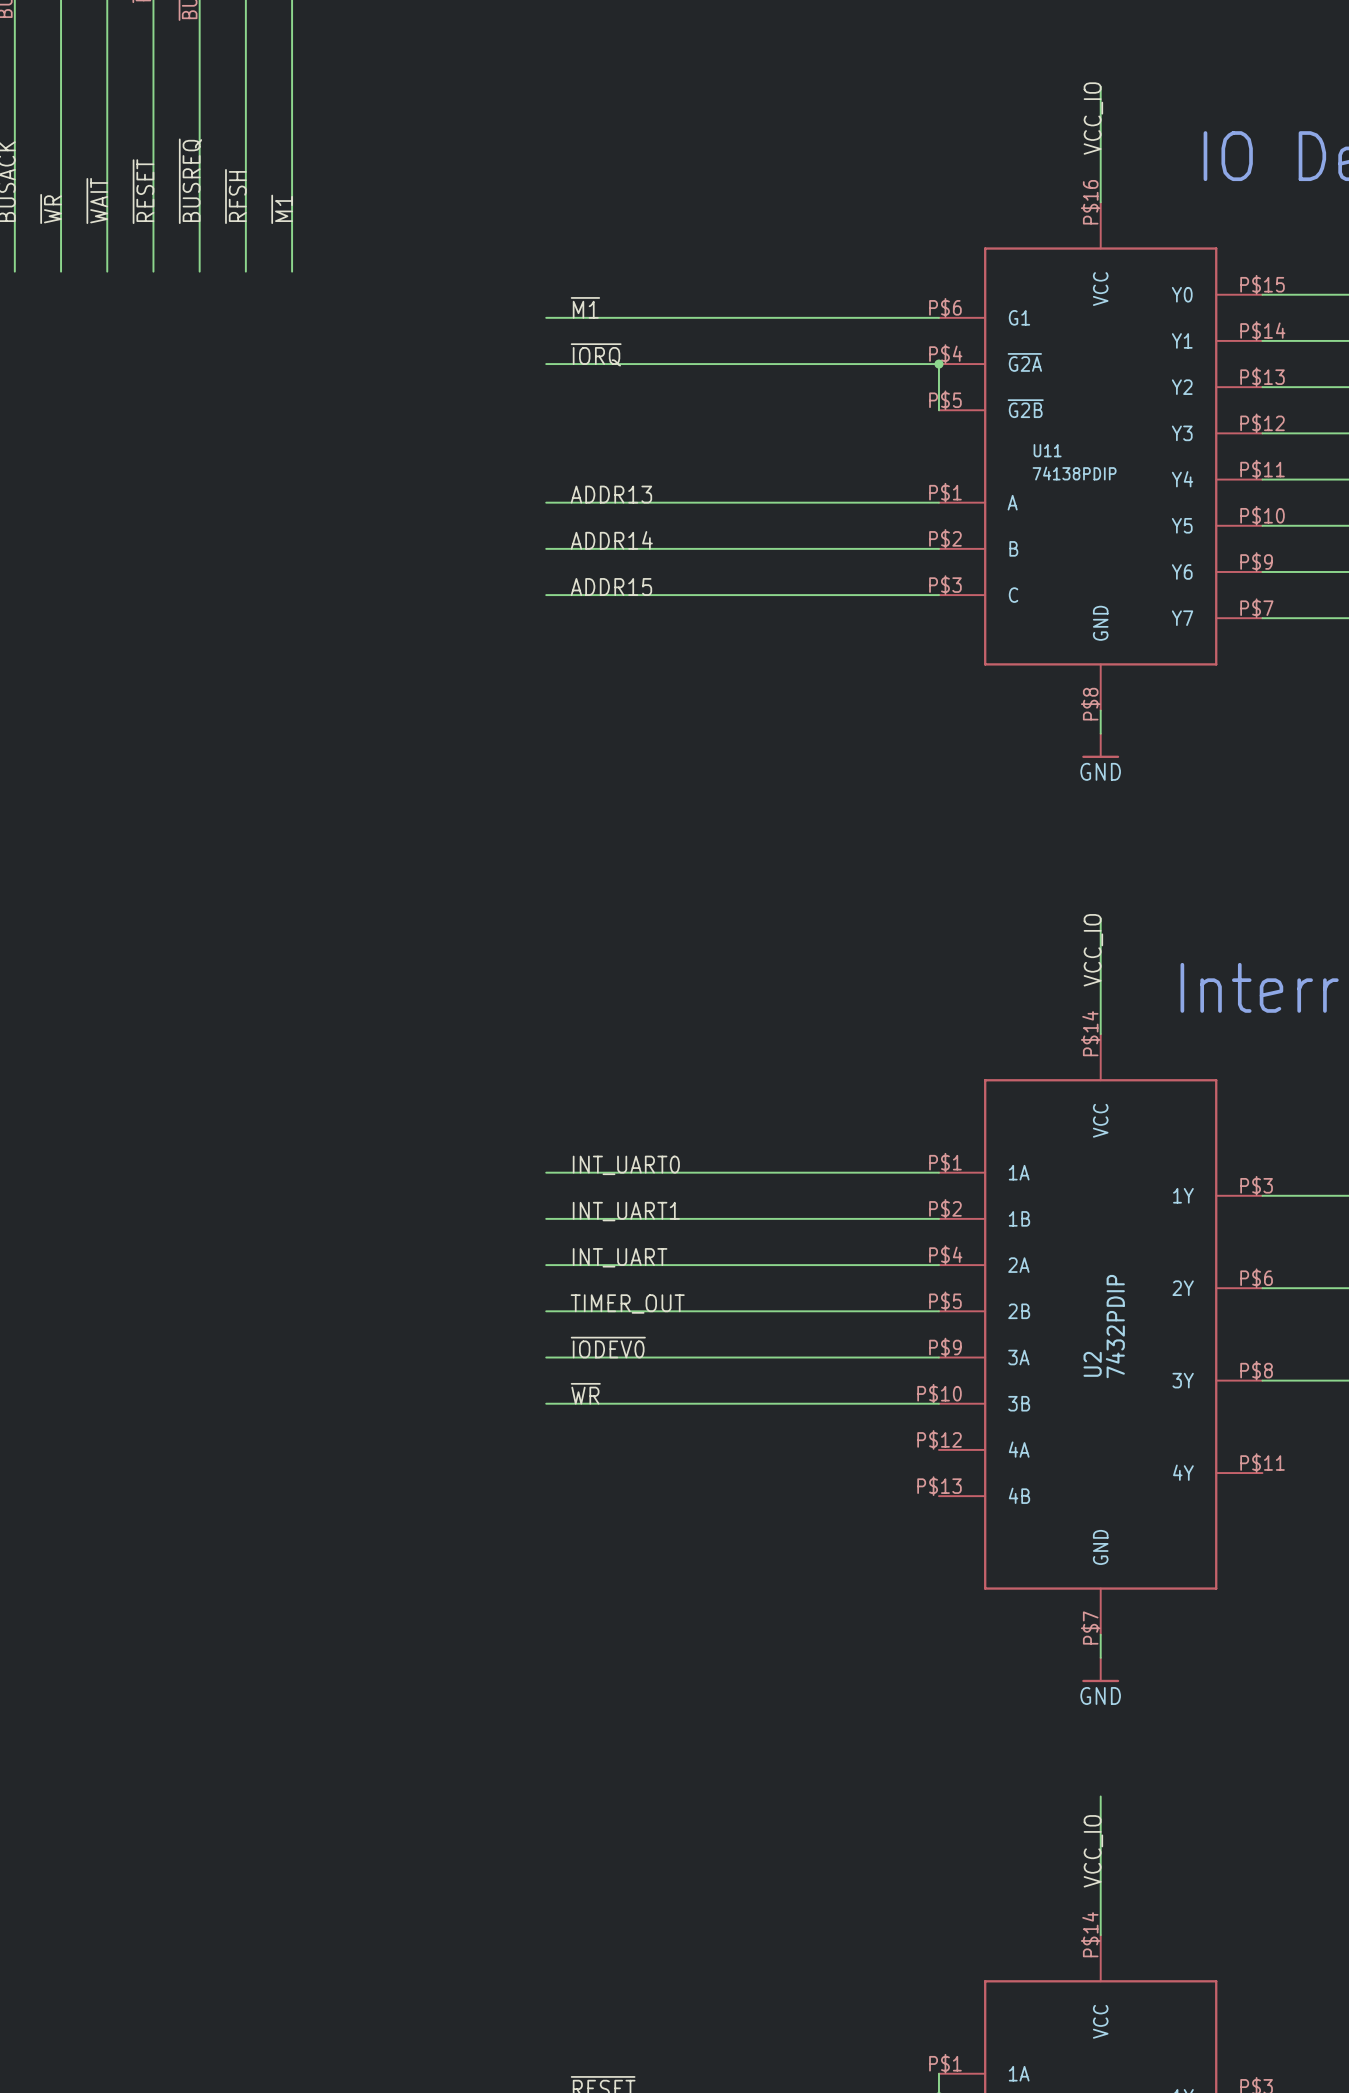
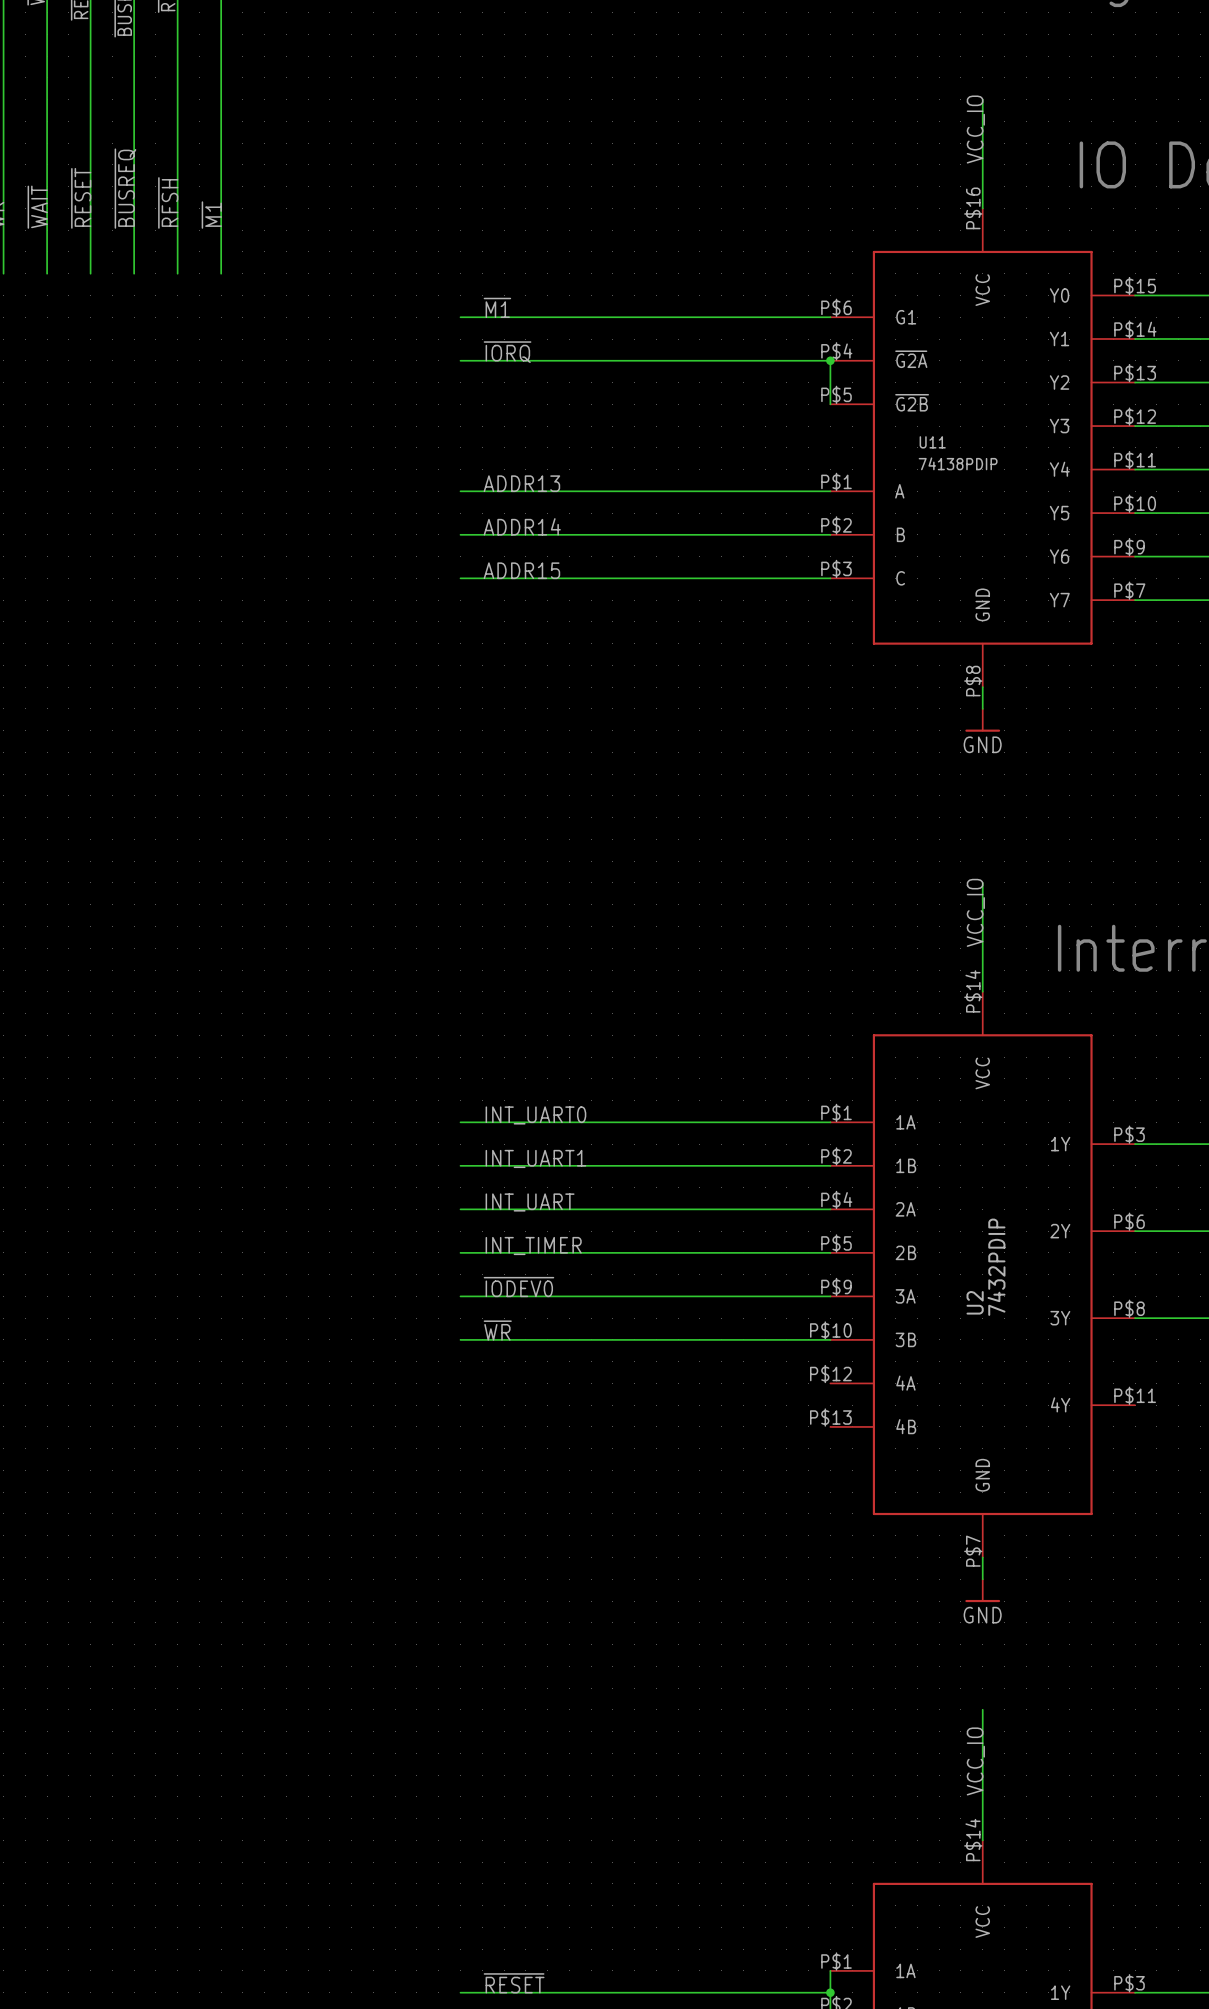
label: TIMER_OUT (627, 1303) -> INT_TIMER (533, 1245)

